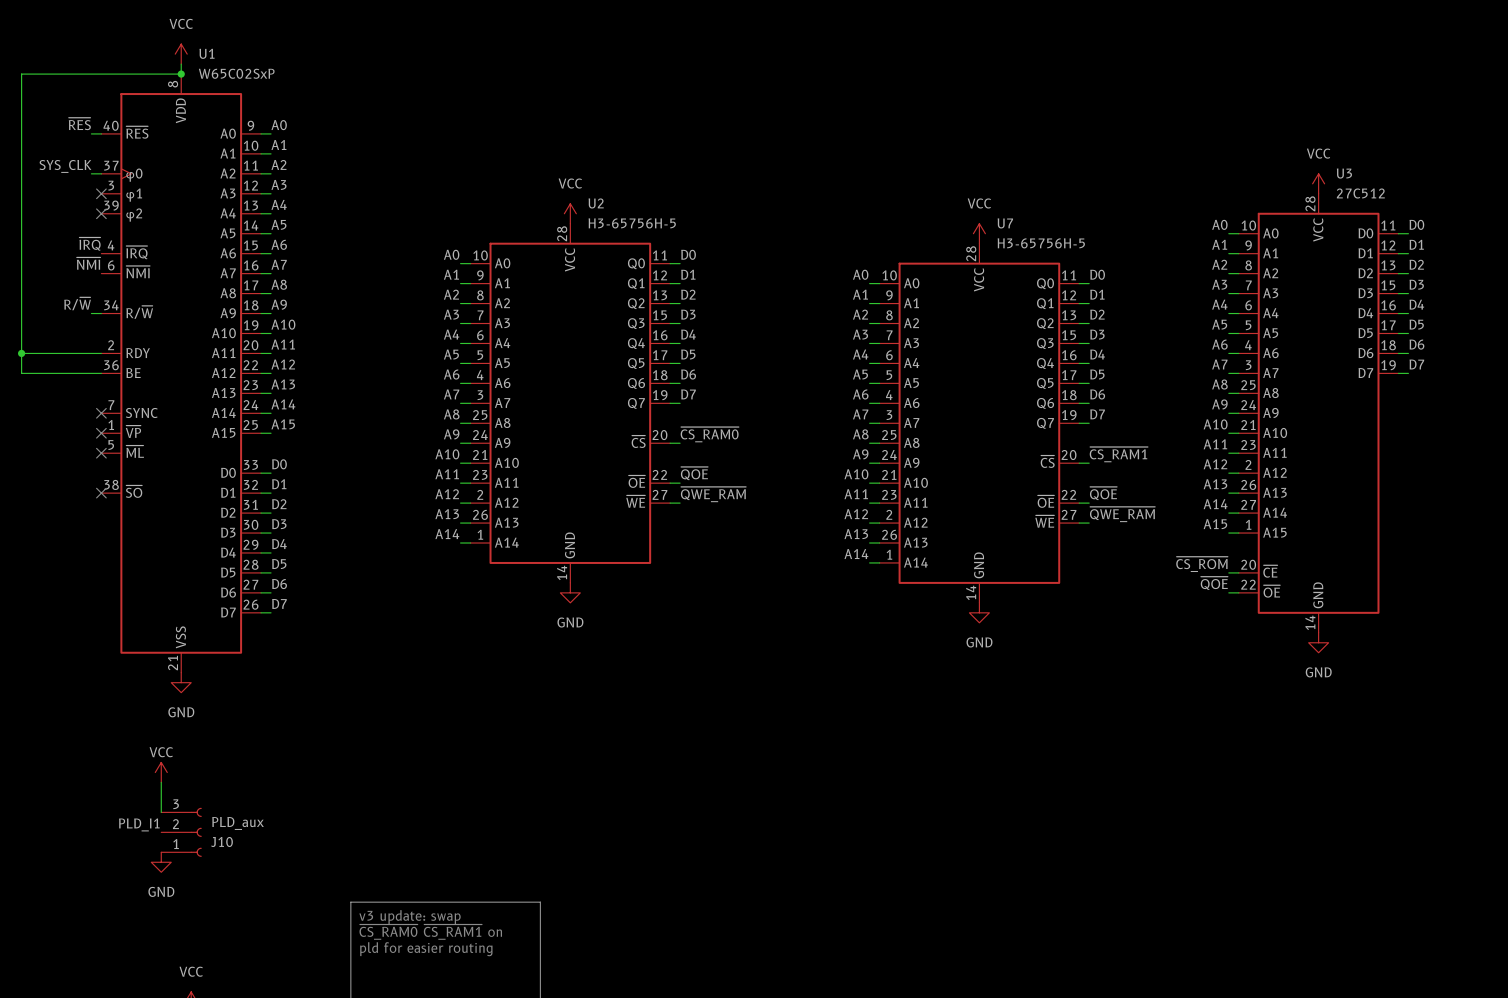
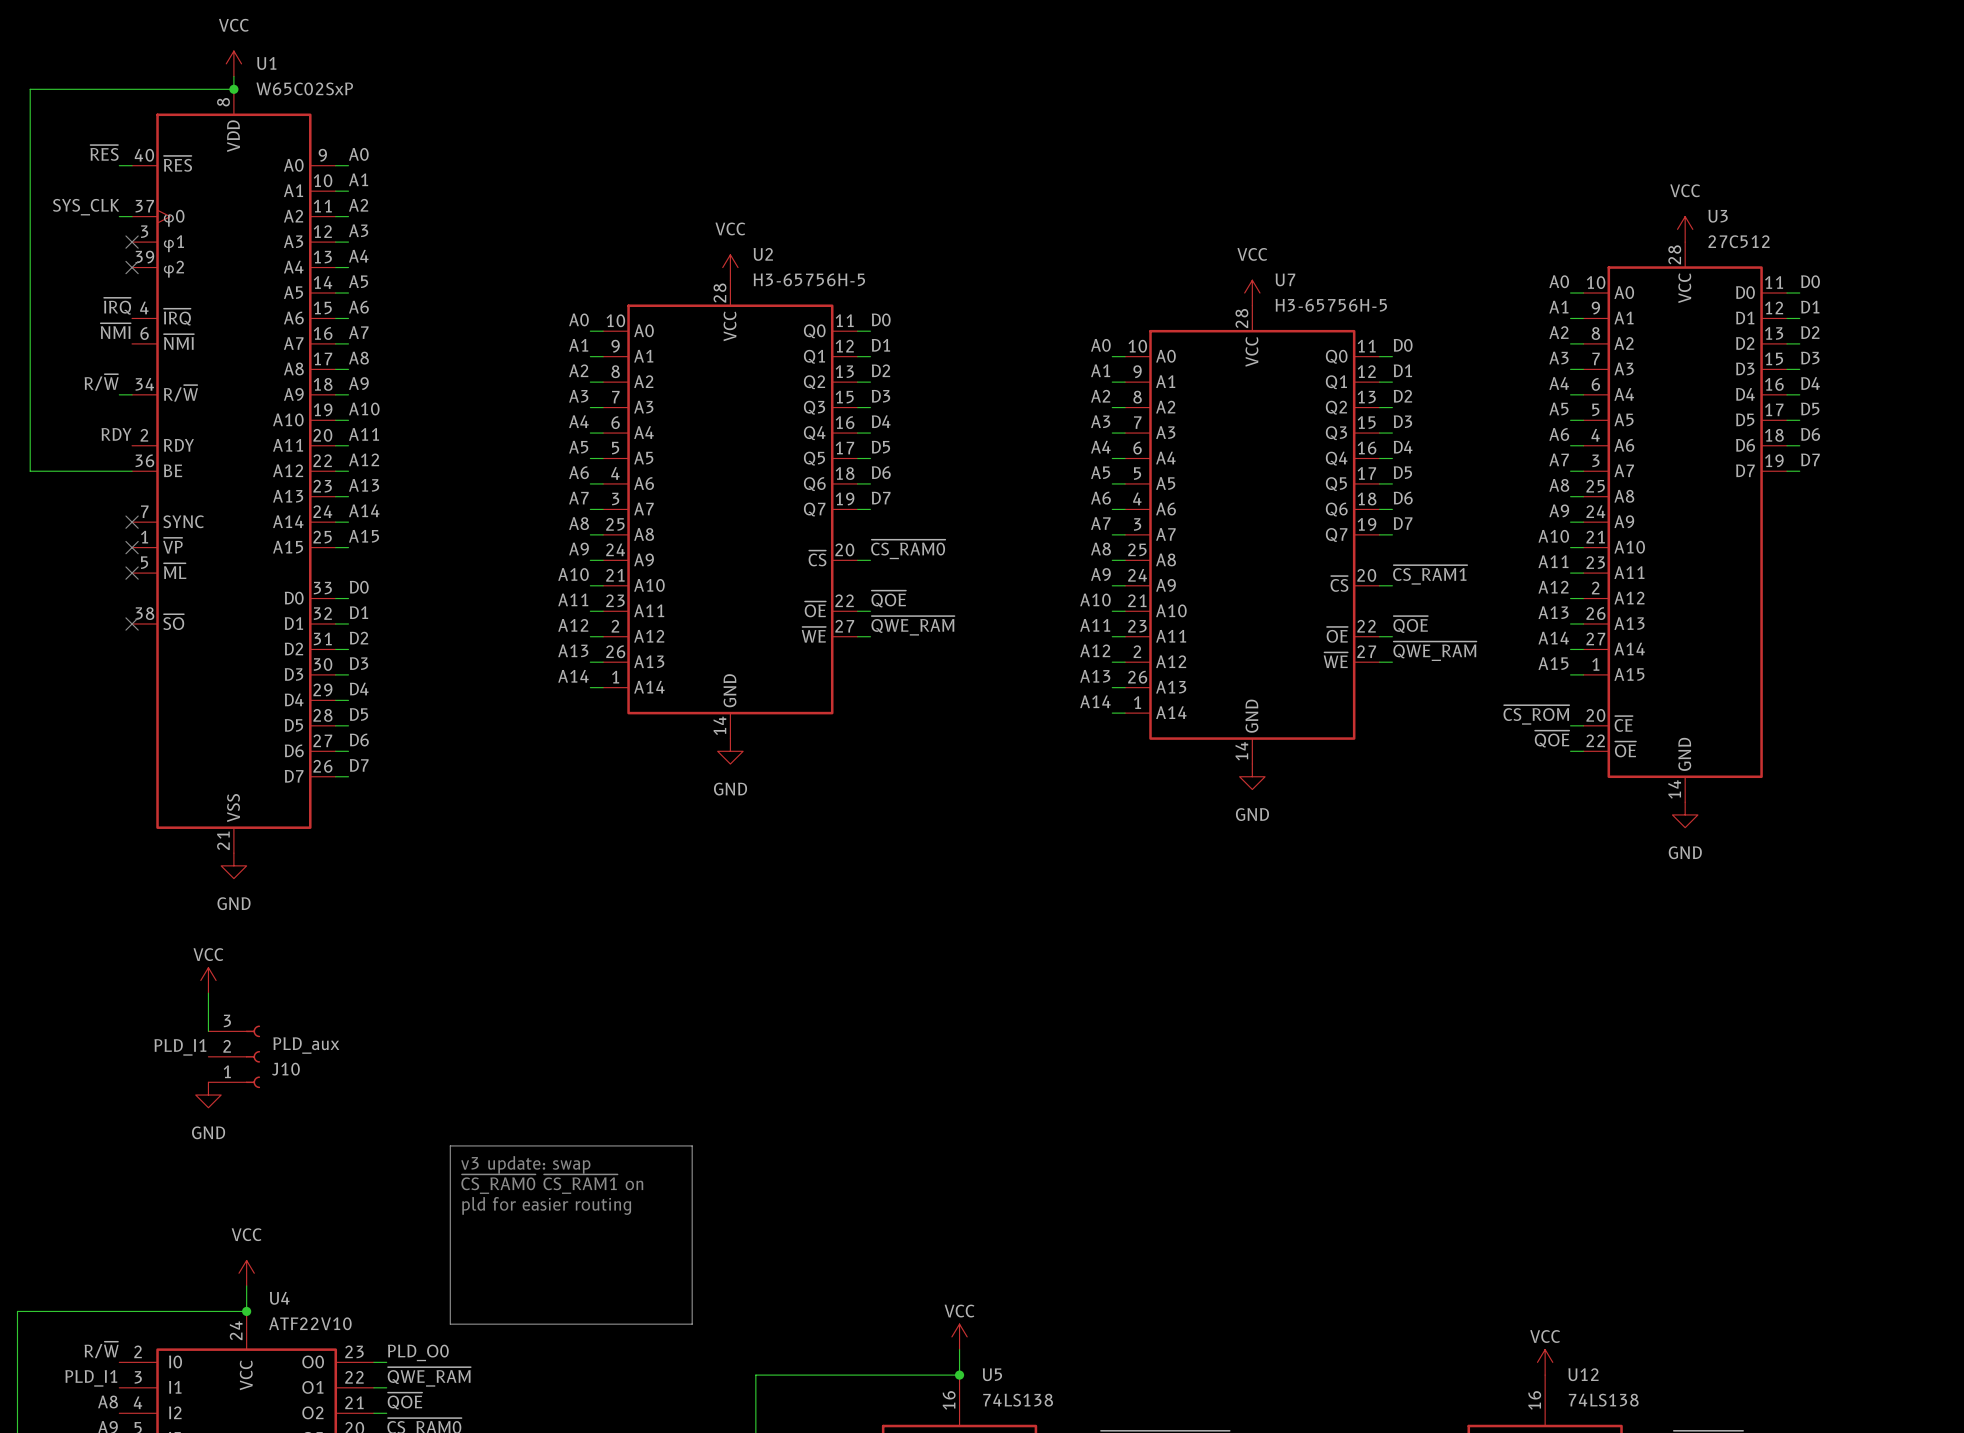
label: none -> RDY (116, 434)
wire: (21, 353) (101, 353) -> none
junction: (21, 353) -> none

